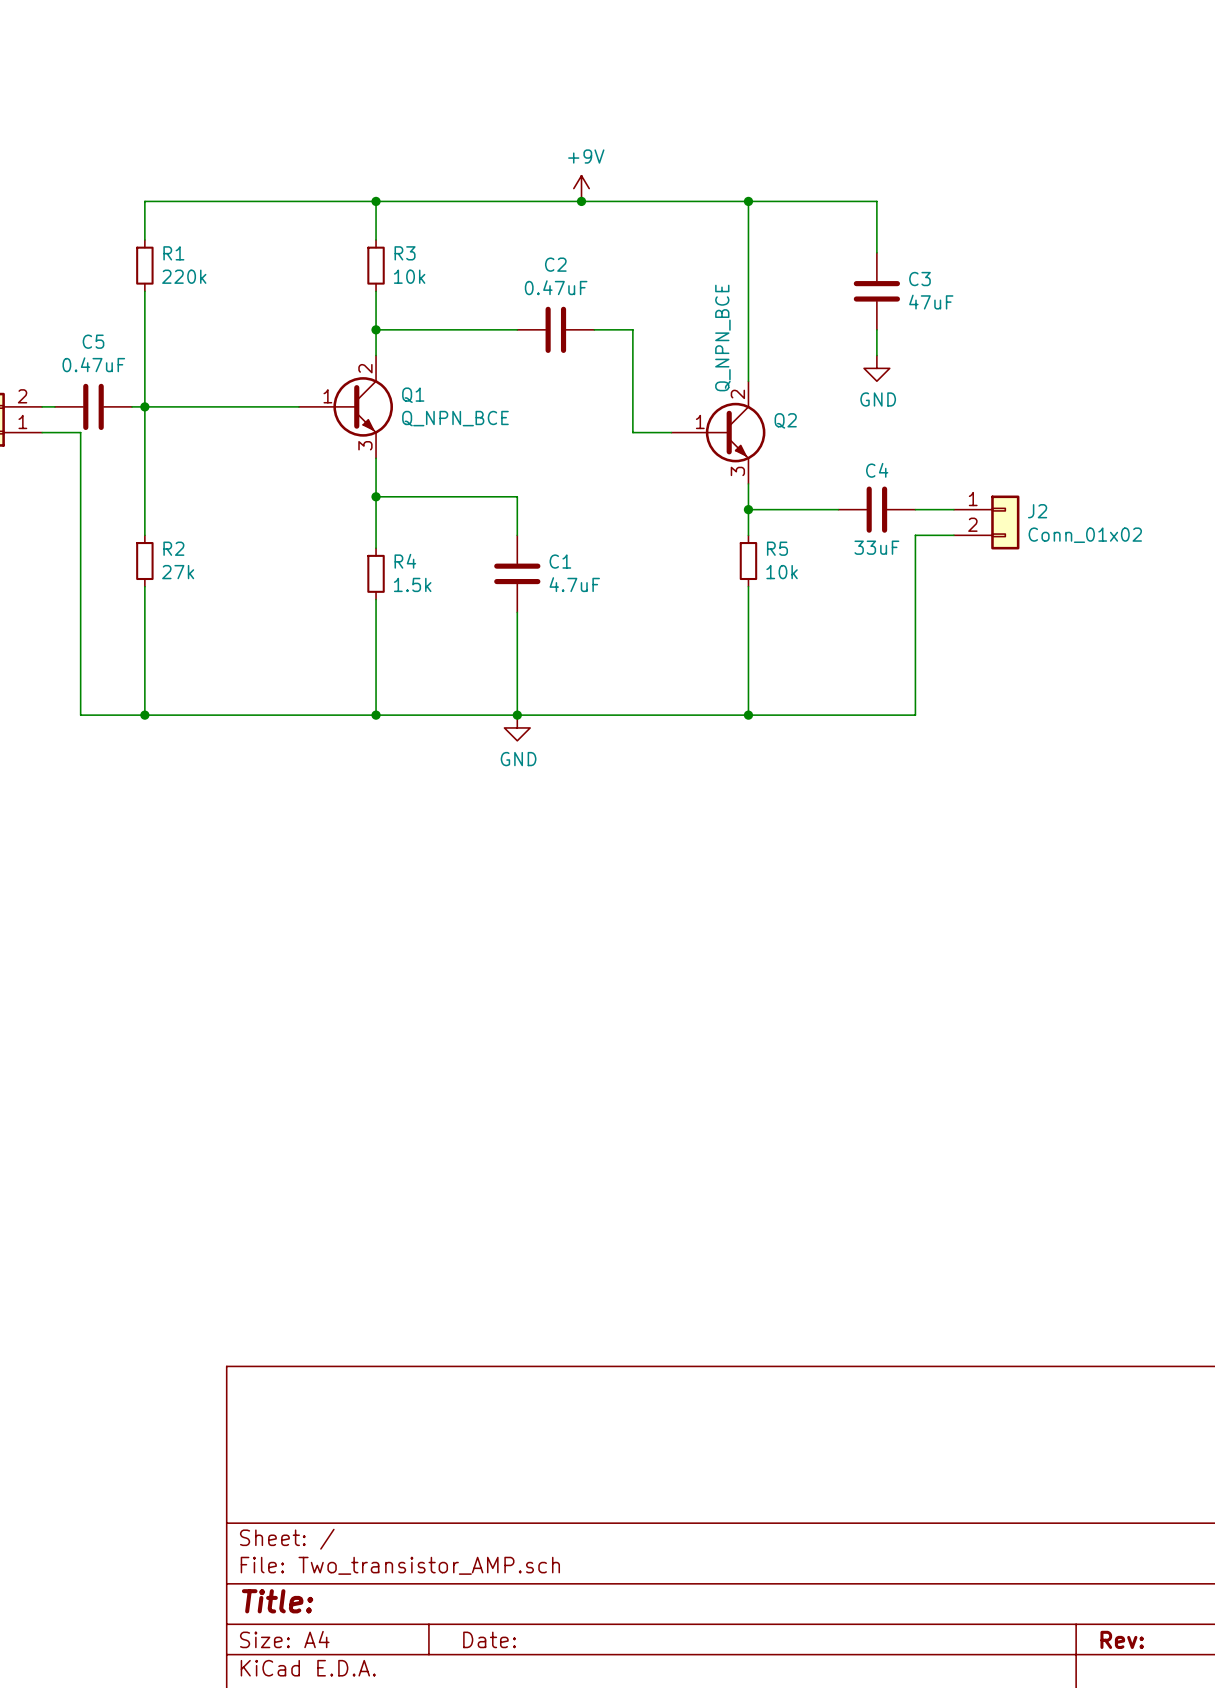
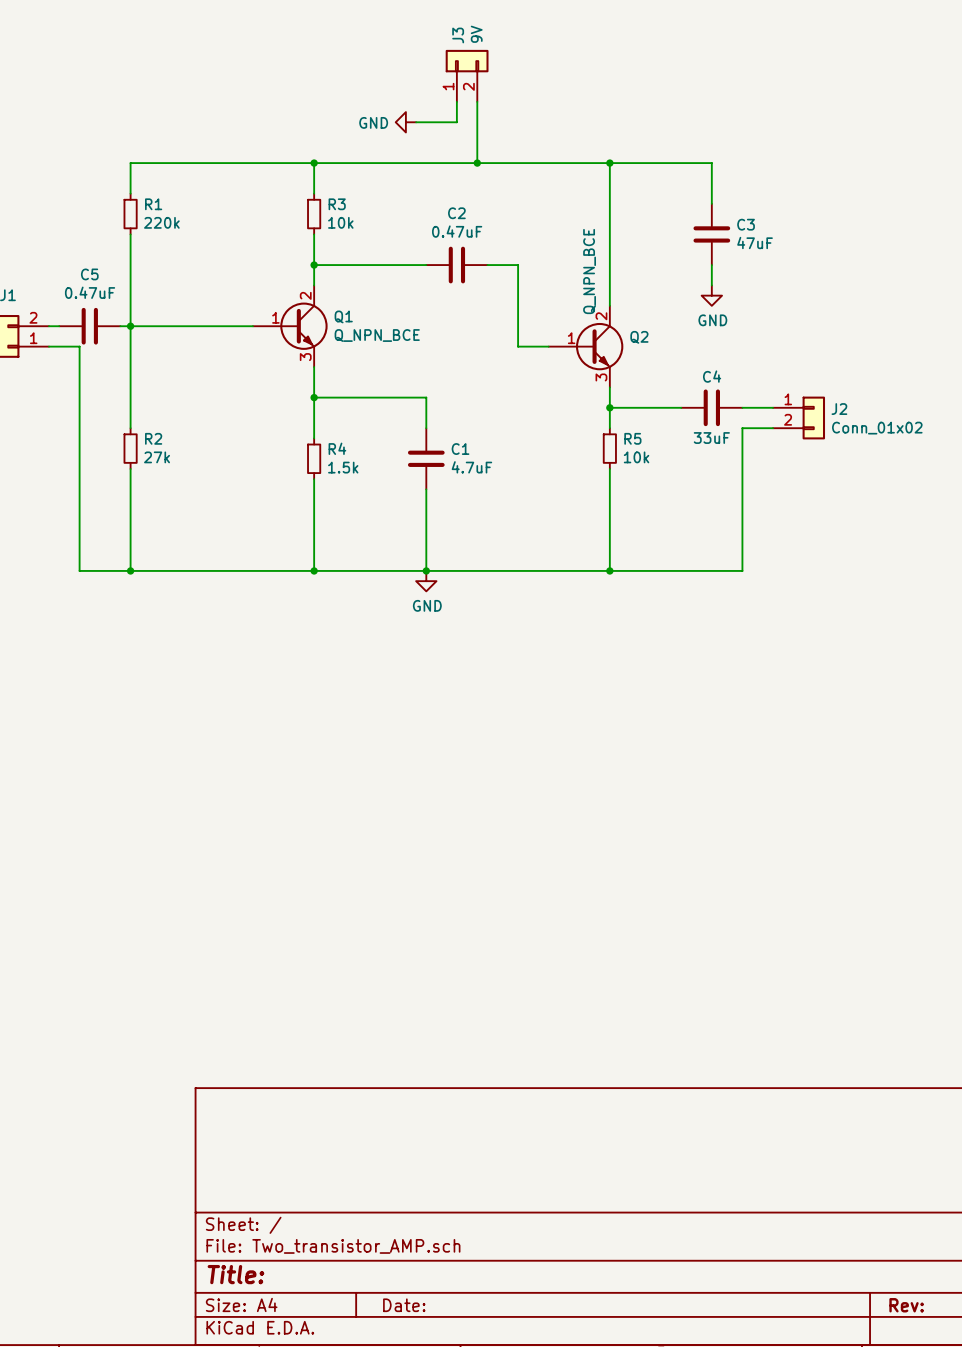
J3: none -> 9V (467, 75)
wire: none -> (456, 101) (456, 122) (416, 122)
wire: none -> (477, 101) (477, 163)
power symbol: none -> GND (405, 122)
power symbol: +9V (581, 188) -> none

